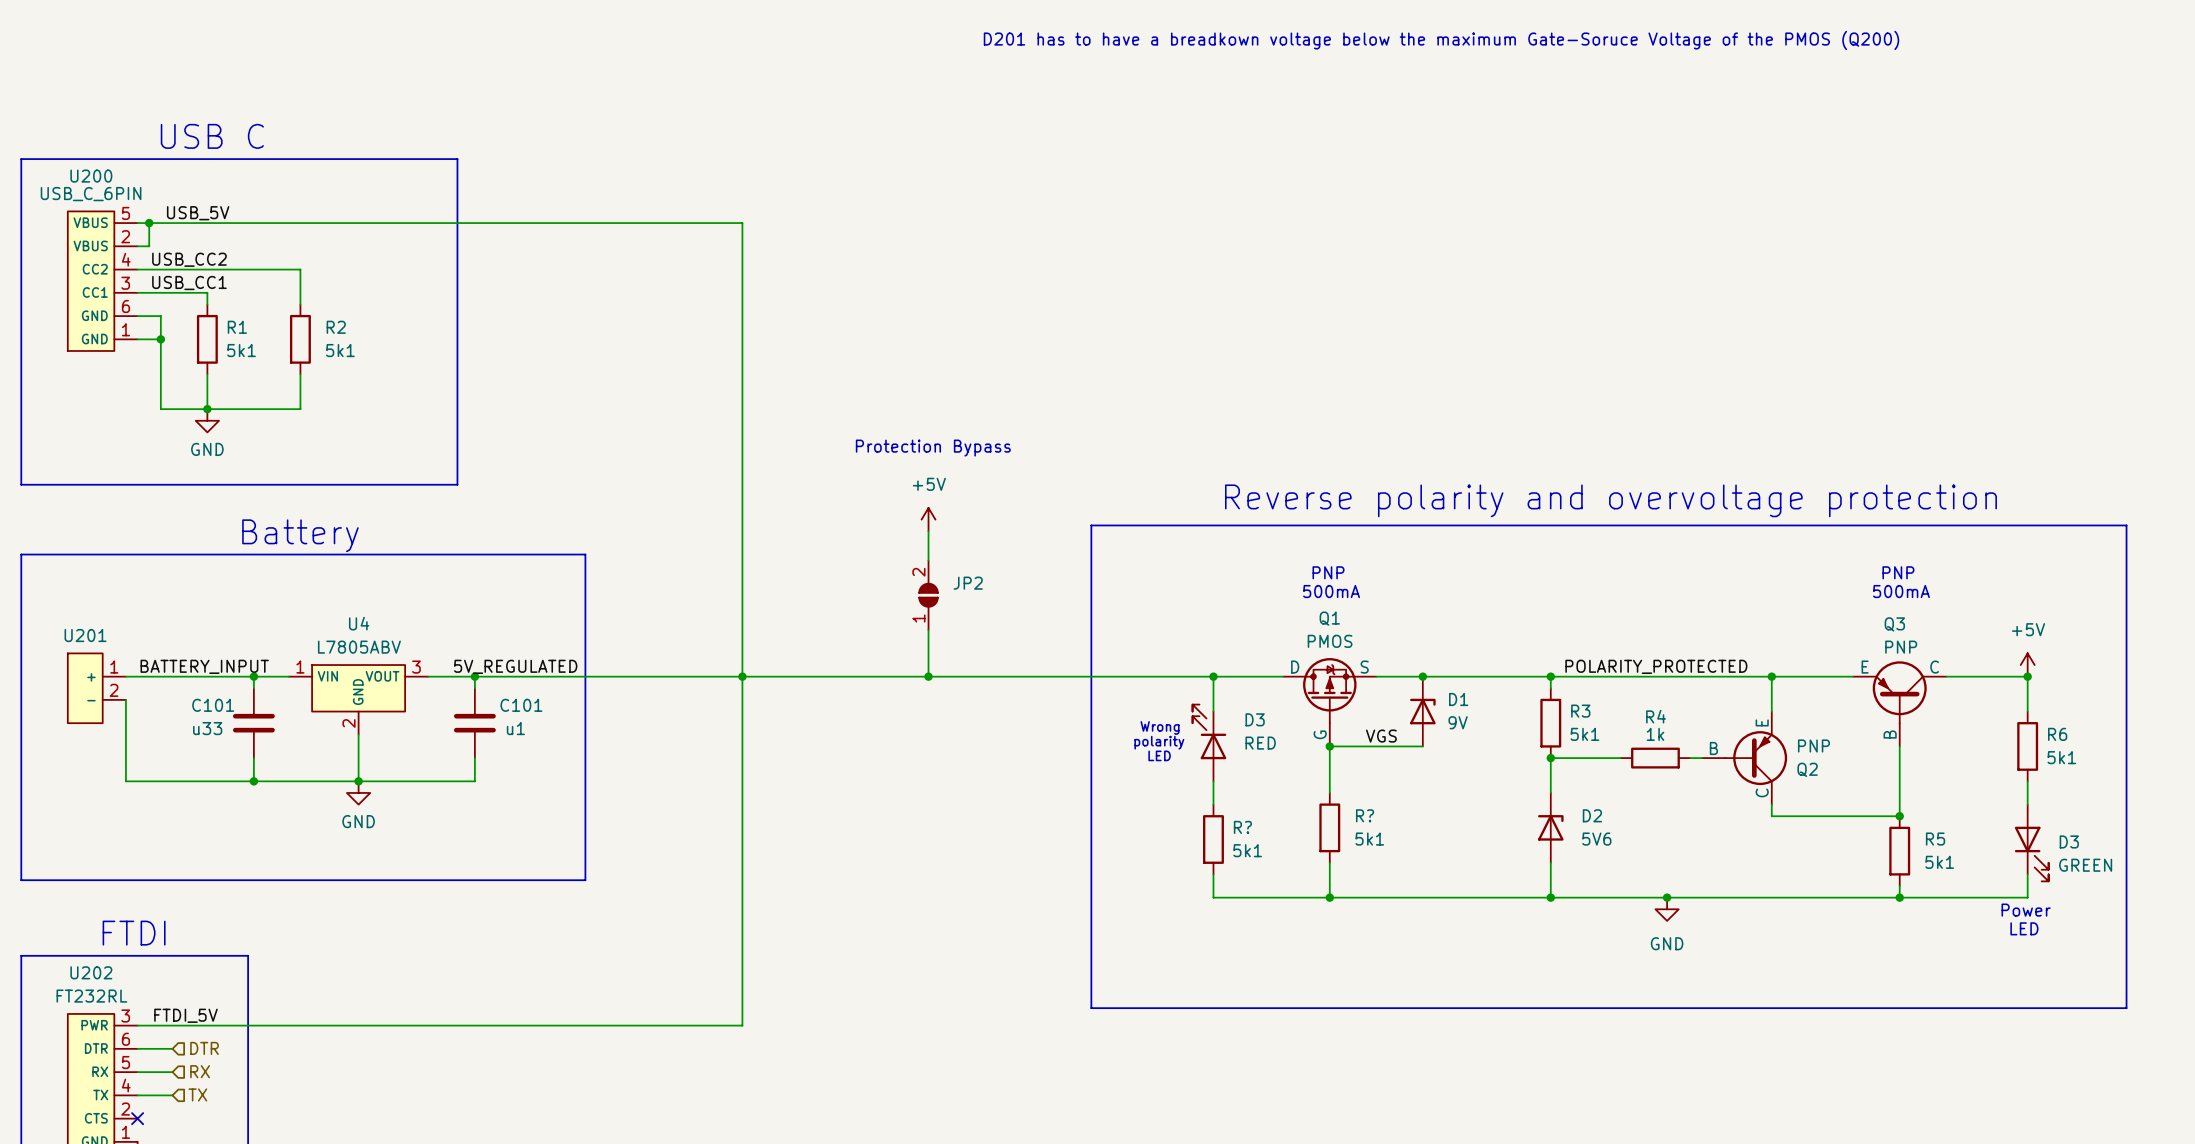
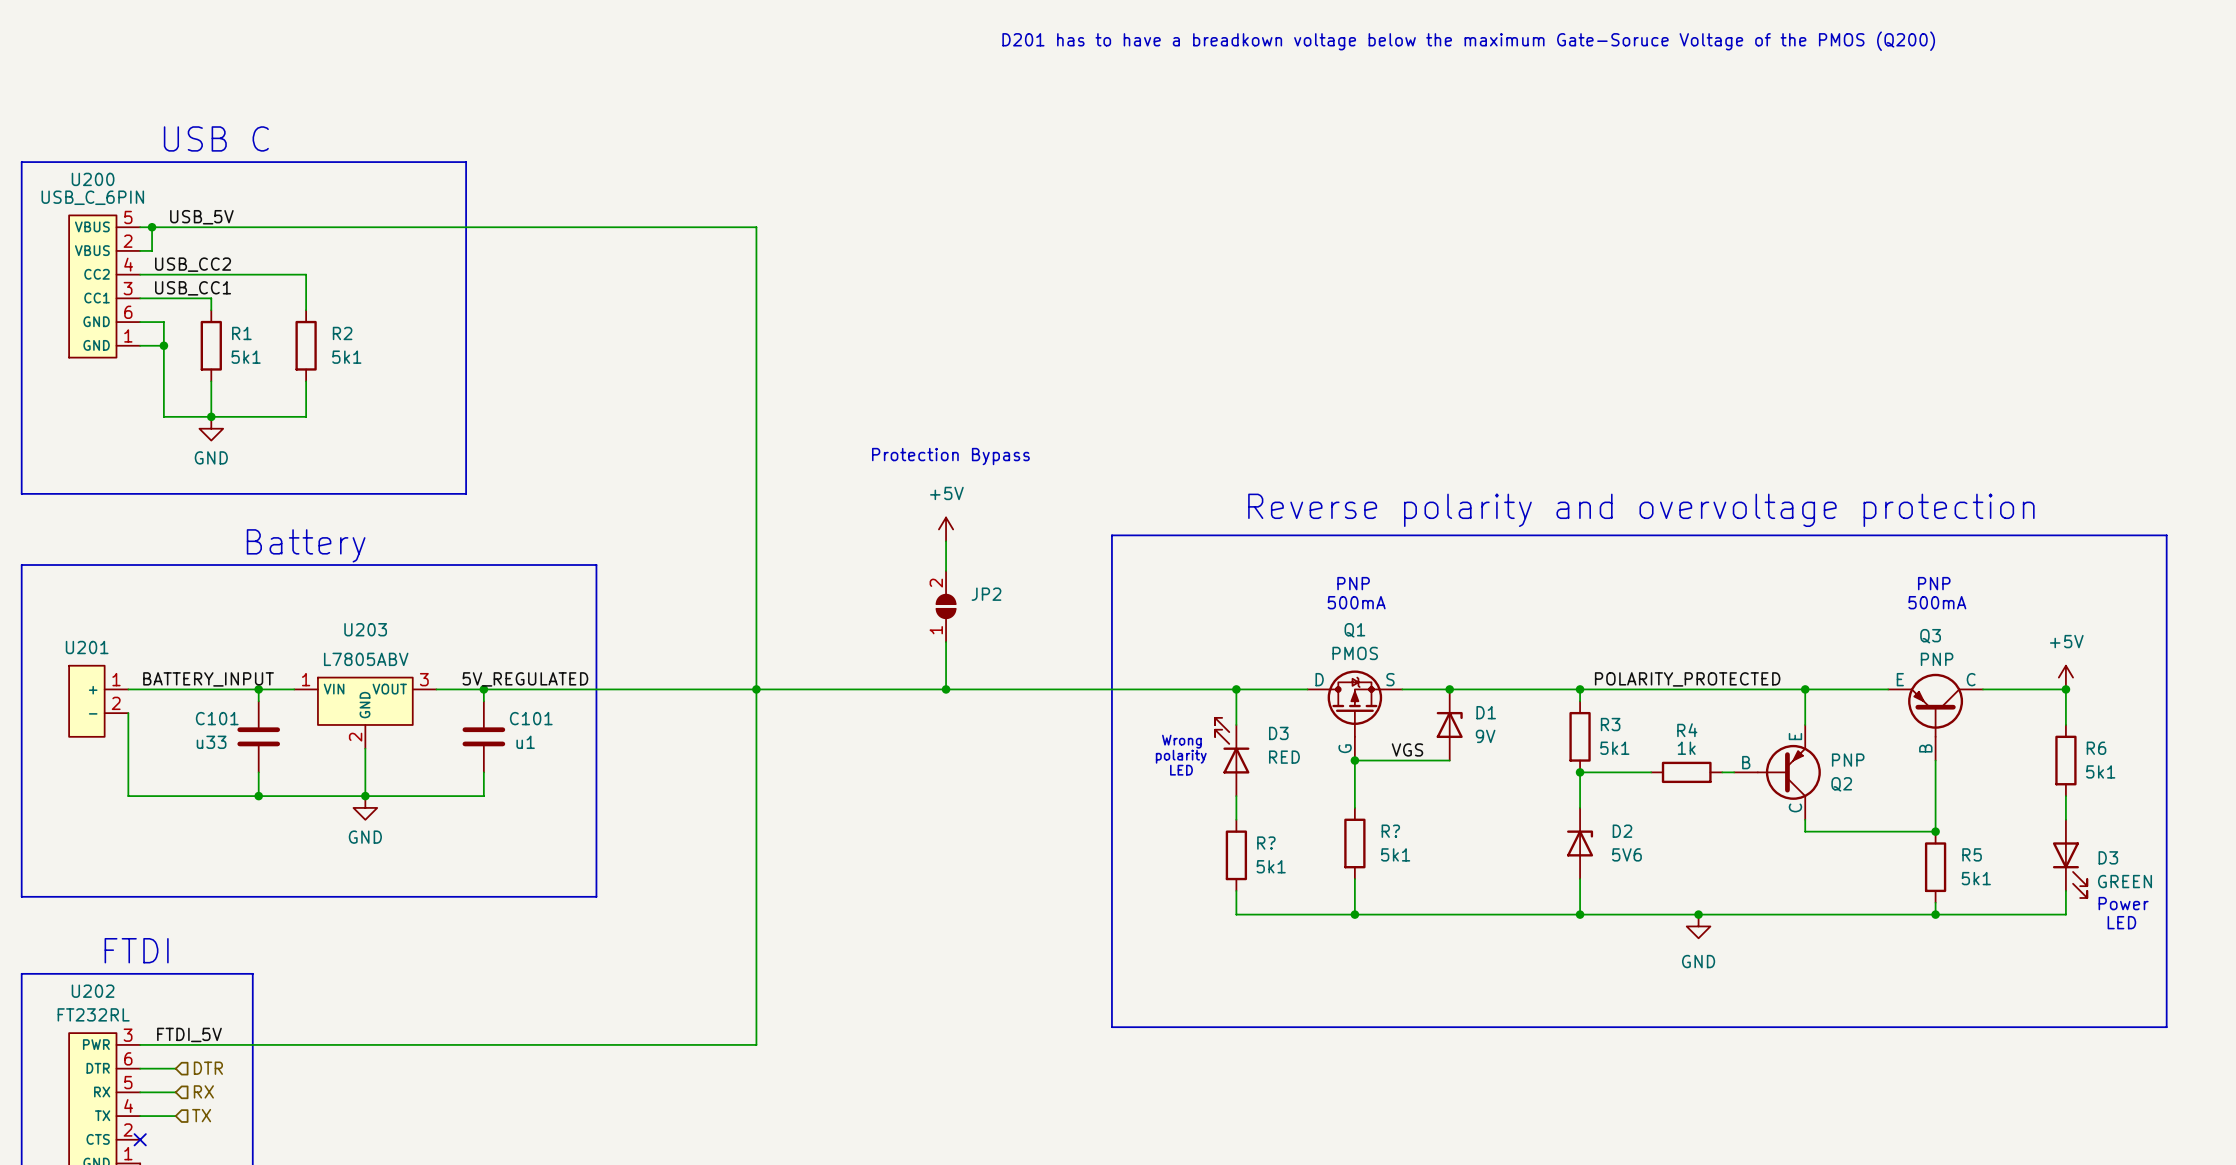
U4 name: U4 (359, 623) -> U203 (365, 629)
text position: Power (2026, 910) -> Power (2123, 903)
text position: LED (2024, 928) -> LED (2121, 922)

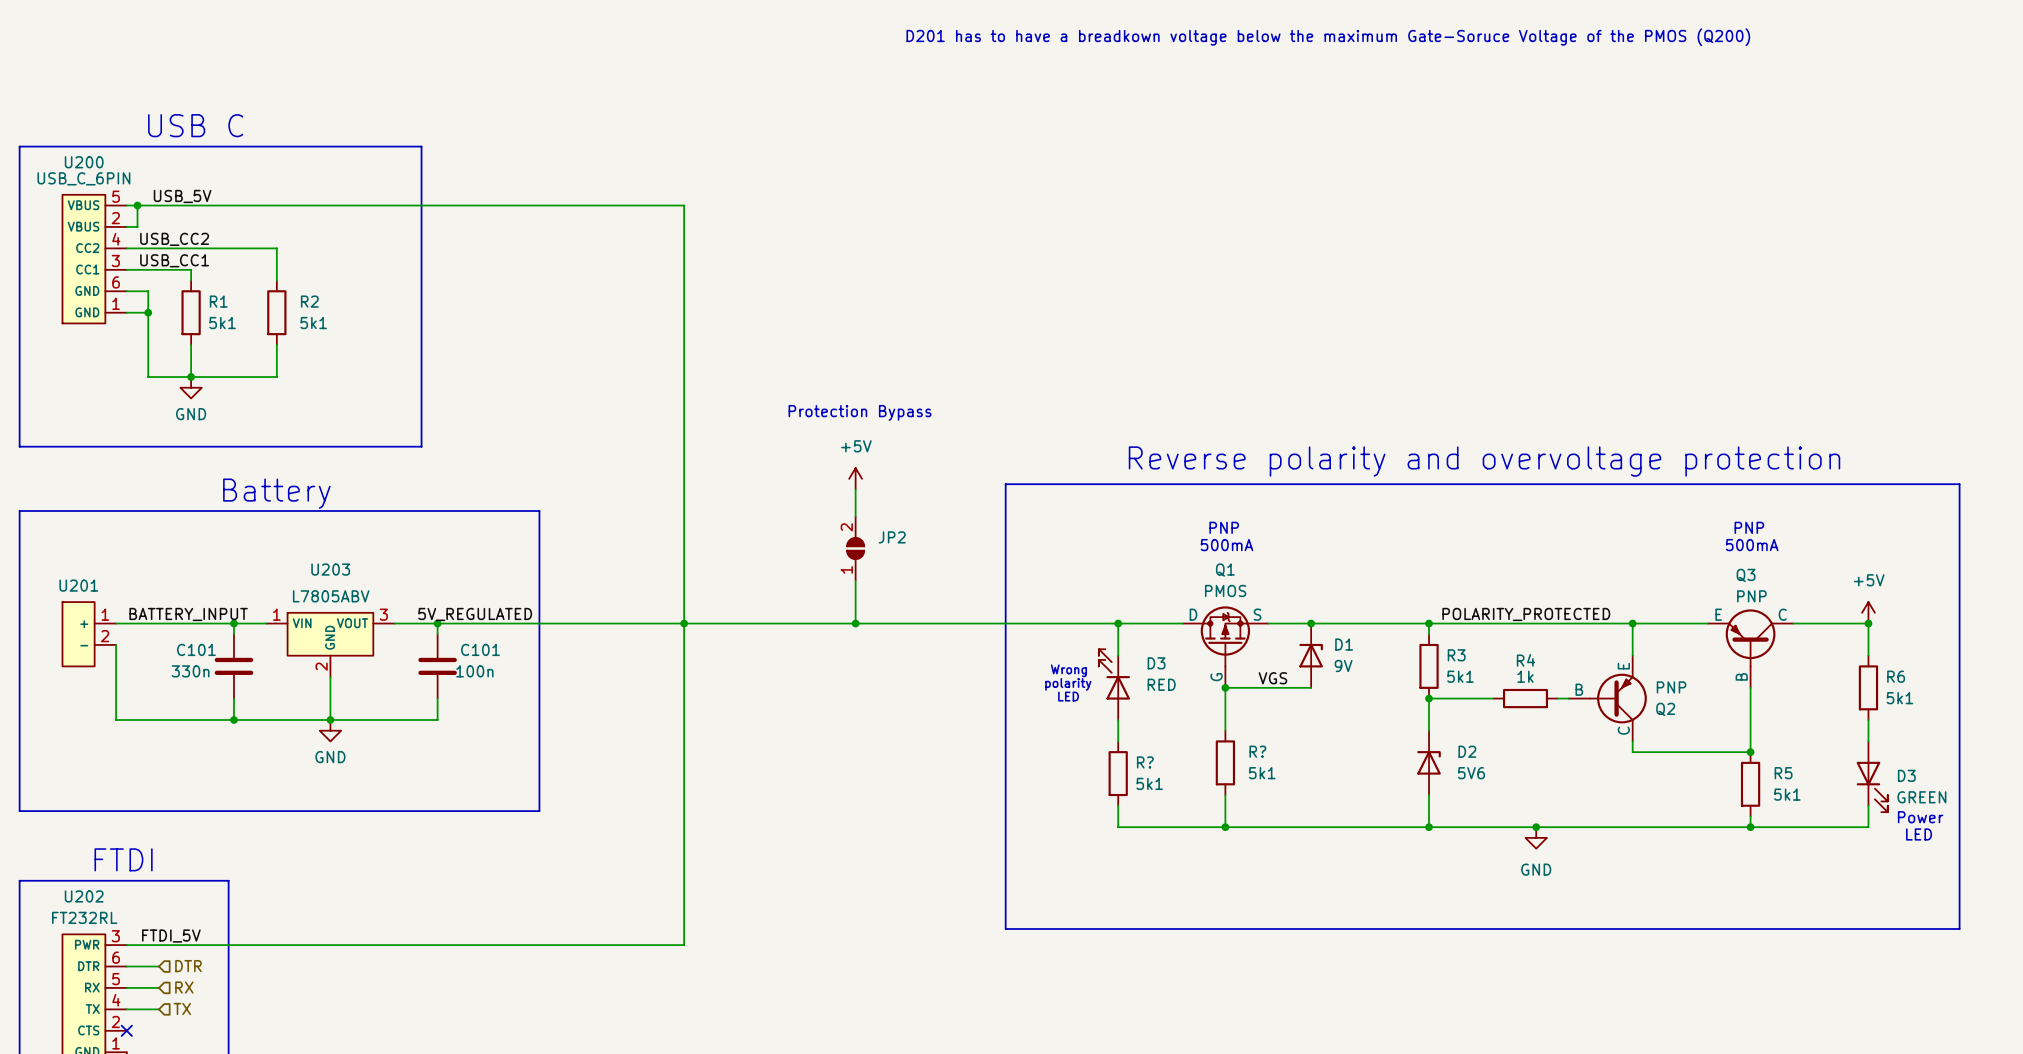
C101 value: u33 (211, 742) -> 330n (190, 671)
C101 value: u1 (525, 742) -> 100n (474, 671)

